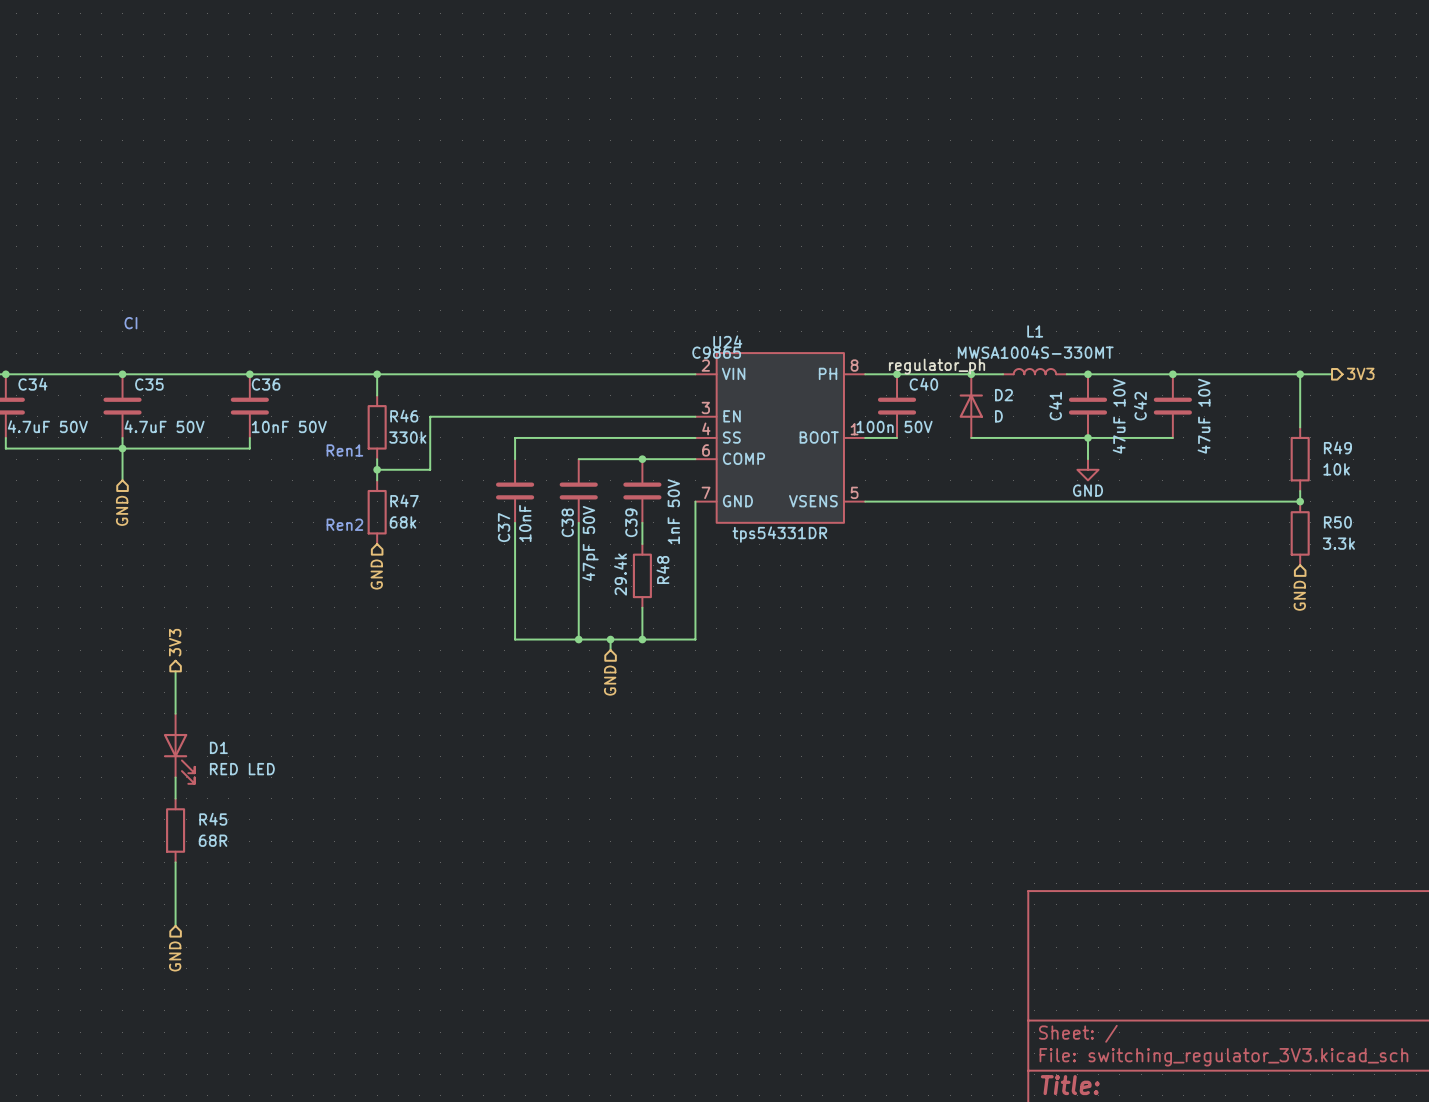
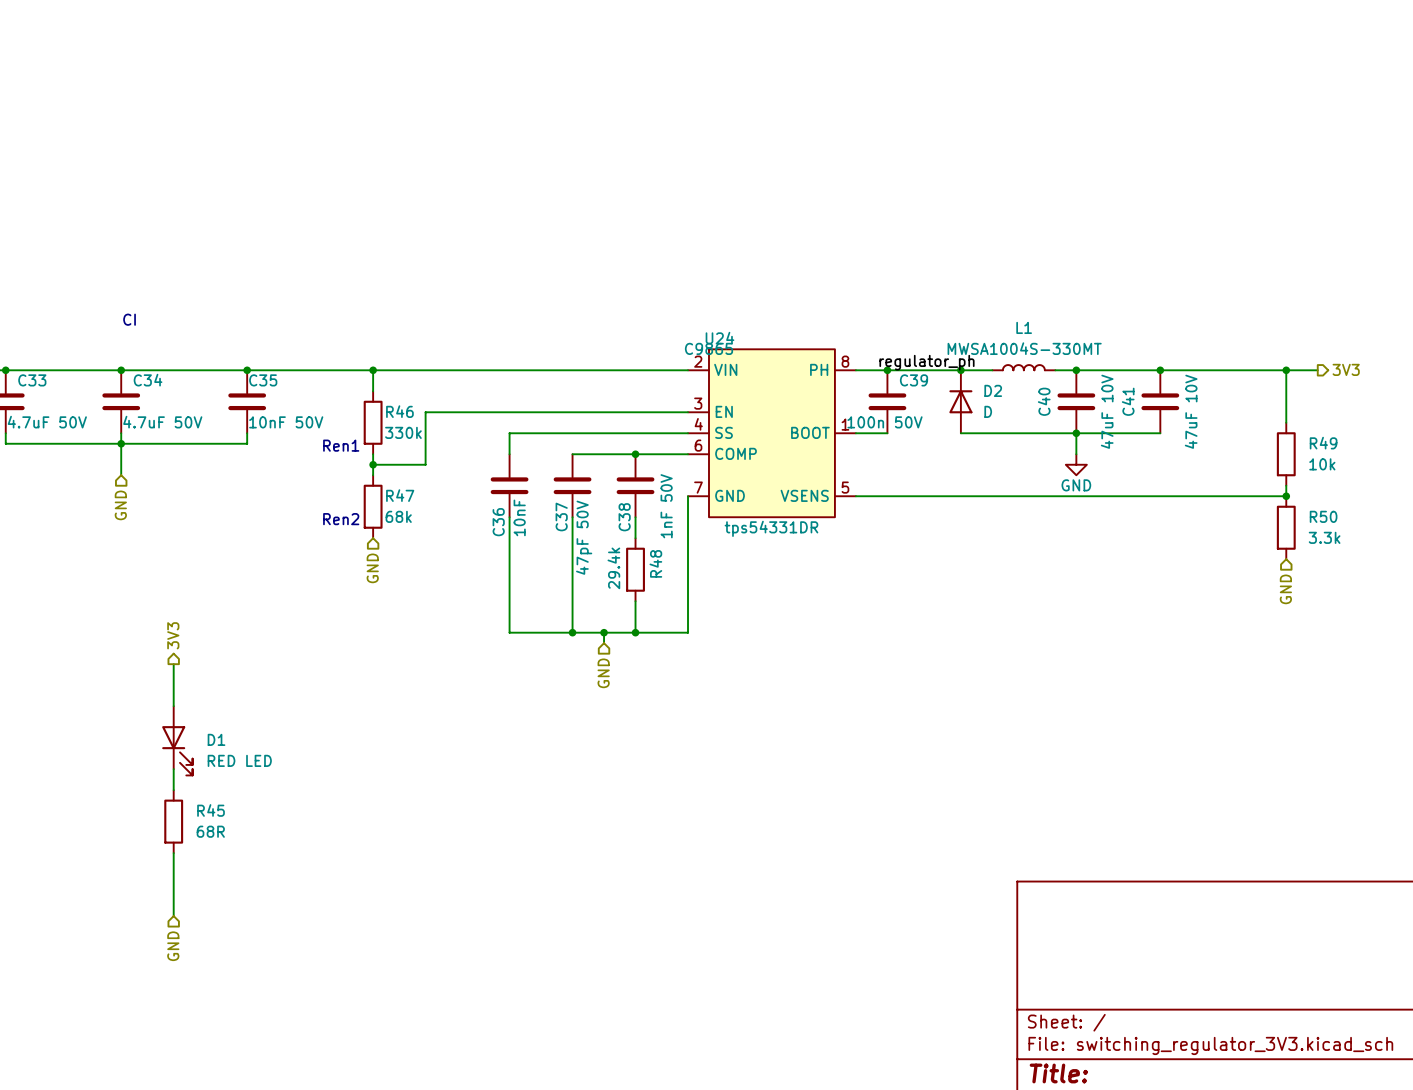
C34 name: C34 (32, 384) -> C33 (32, 380)
C35 name: C35 (149, 384) -> C34 (148, 380)
C36 name: C36 (266, 384) -> C35 (263, 380)
C40 name: C40 (923, 384) -> C39 (913, 380)
C41 name: C41 (1055, 406) -> C40 (1044, 401)
C42 name: C42 (1140, 406) -> C41 (1128, 401)
C38 name: C38 (567, 522) -> C37 (561, 516)
C39 name: C39 (631, 522) -> C38 (624, 517)
C37 name: C37 (504, 527) -> C36 (498, 522)

